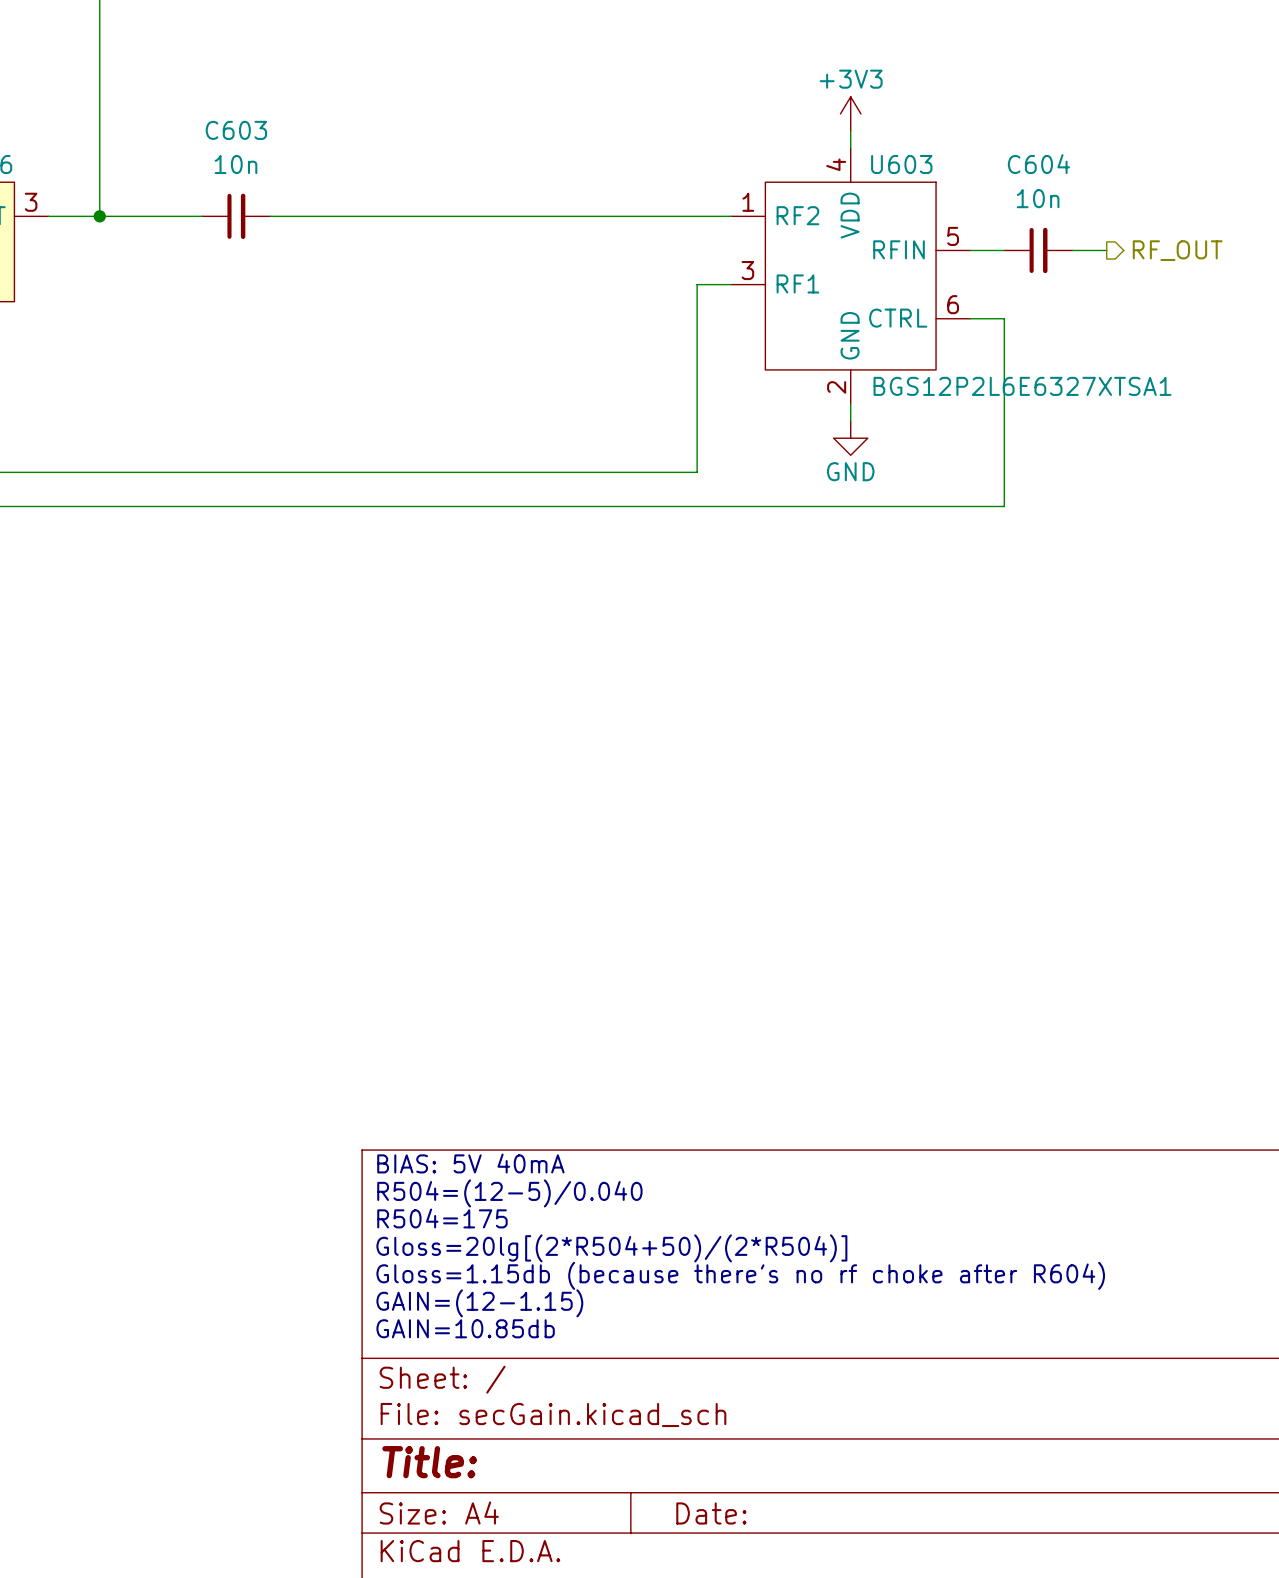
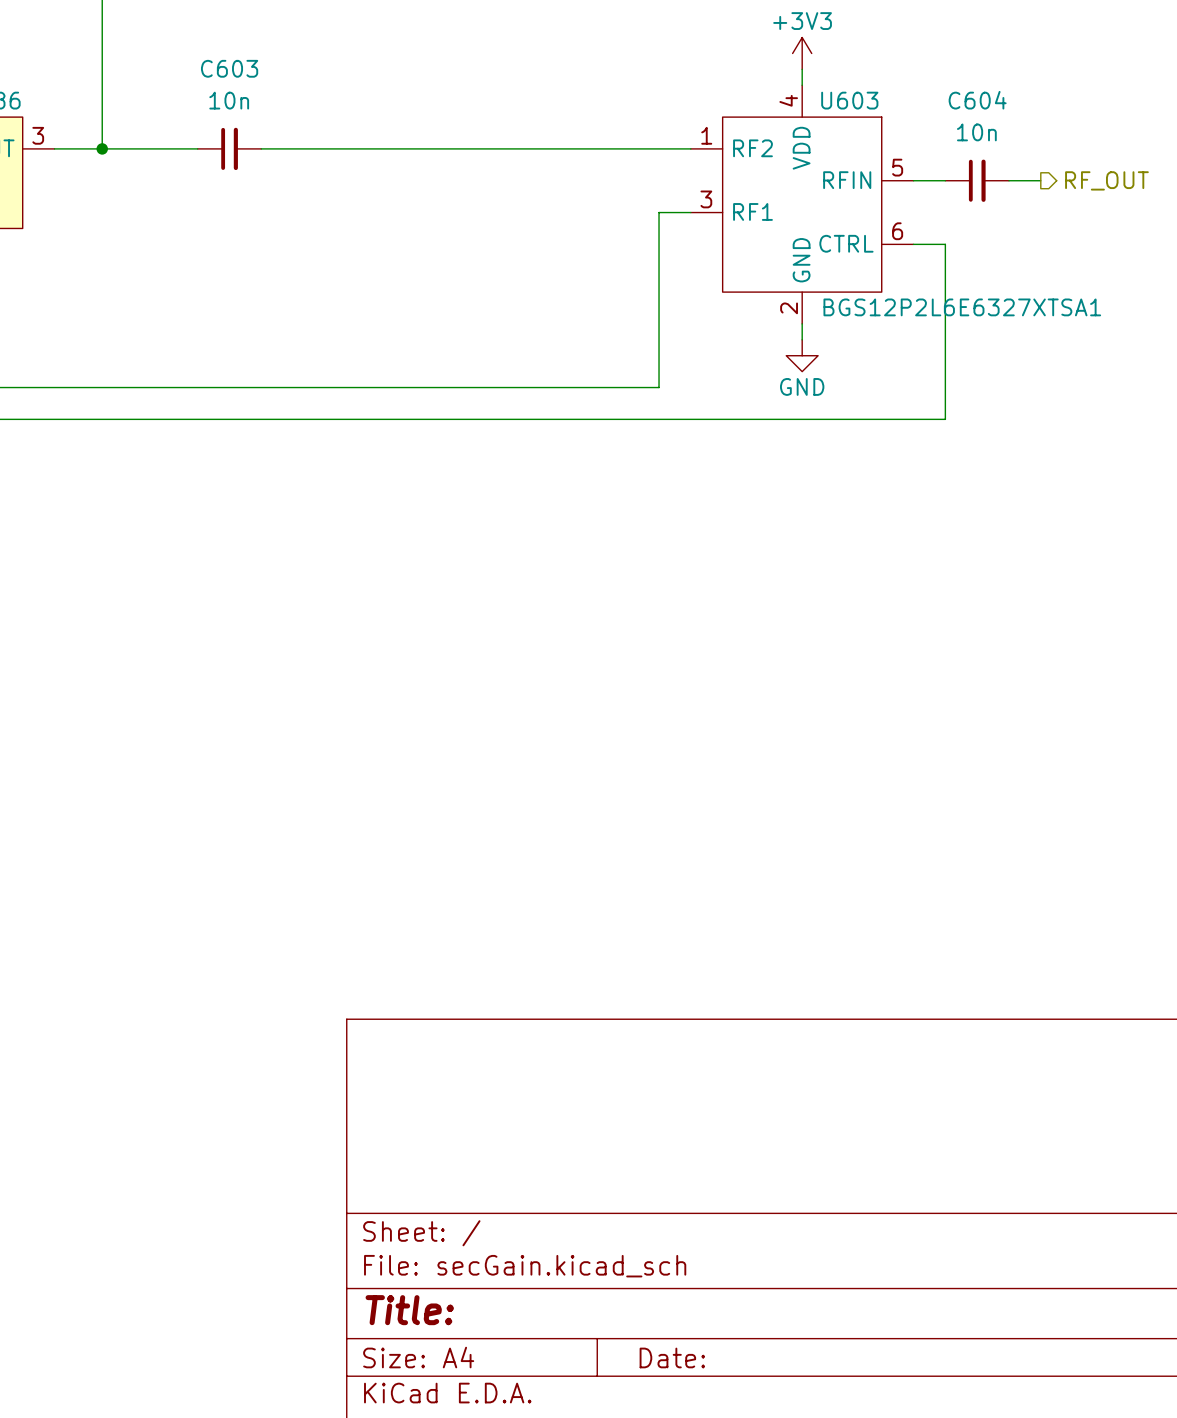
text: BIAS: 5V 40mA (470, 1163) -> none
text: R504=(12-5)/0.040 (509, 1193) -> none
text: R504=175 (442, 1218) -> none
text: Gloss=20lg[(2*R504+50)/(2*R504)] (611, 1248) -> none
text: Gloss=1.15db (because there's no rf choke after R604) (740, 1275) -> none
text: GAIN=(12-1.15) (479, 1303) -> none
text: GAIN=10.85db (465, 1328) -> none

